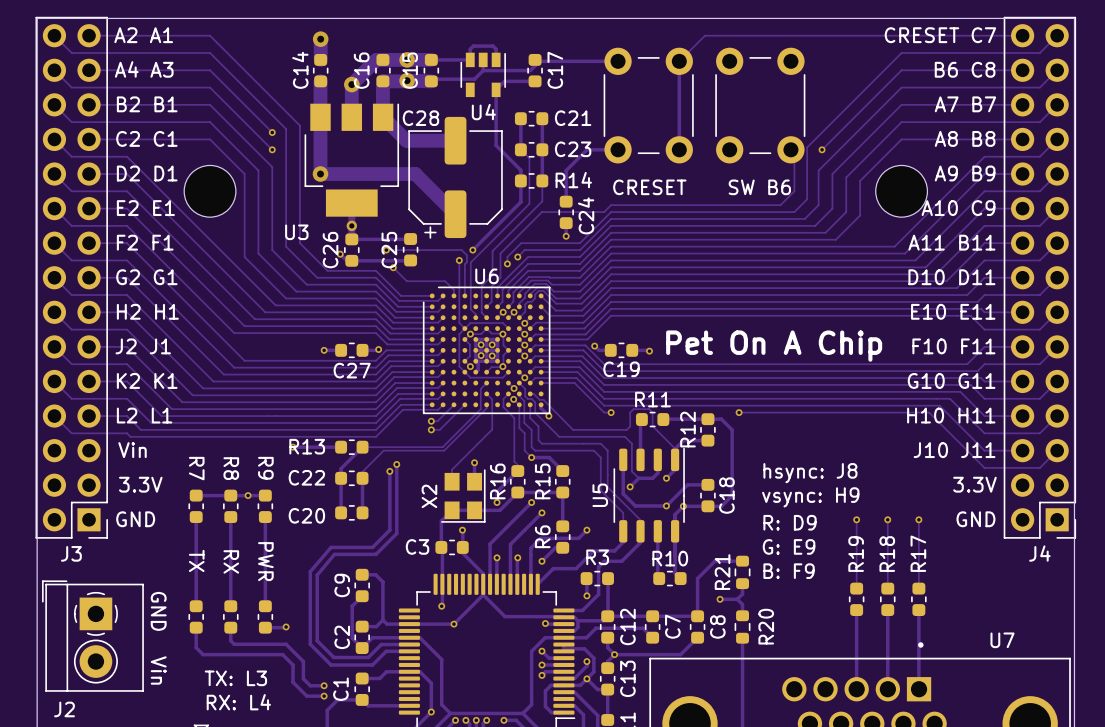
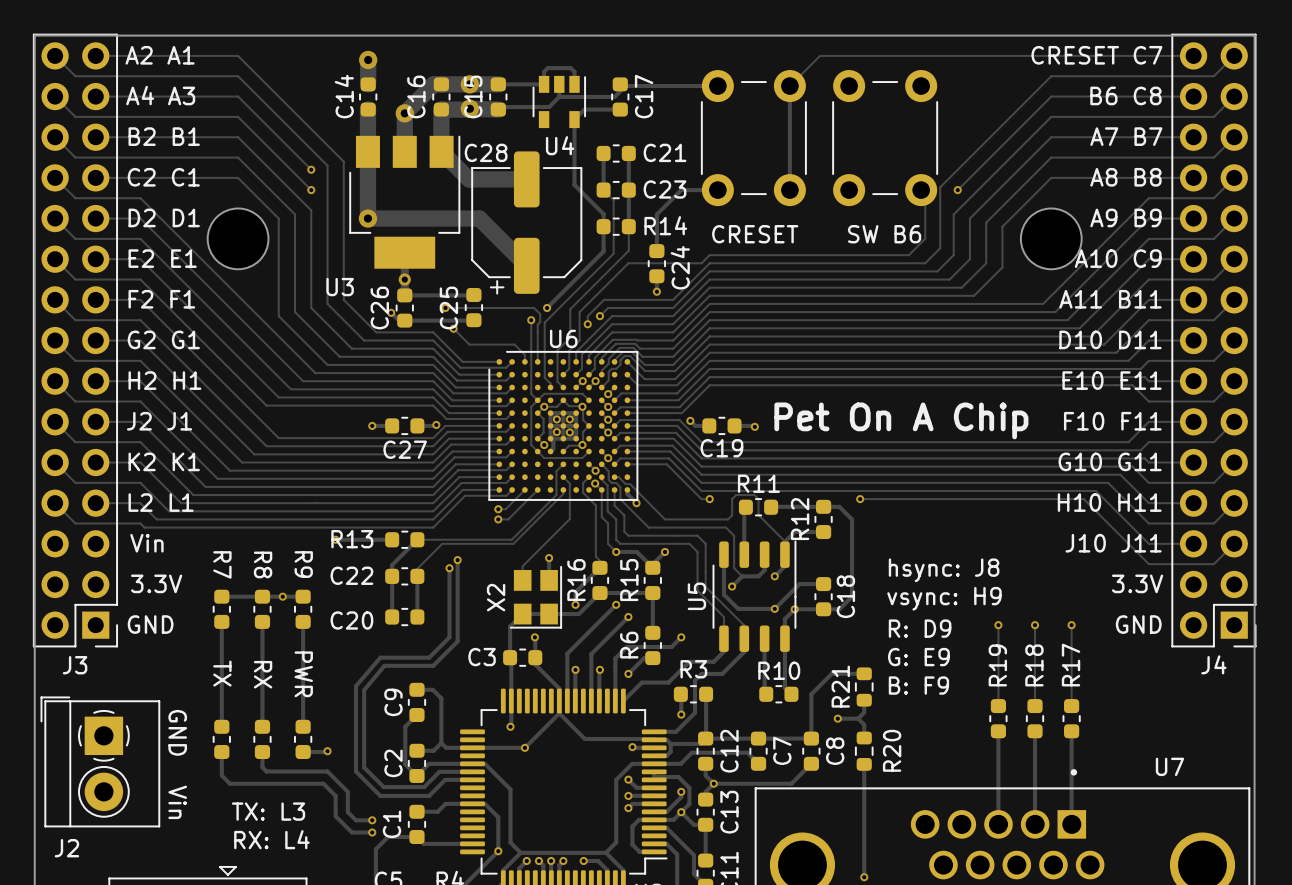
track: none -> (665, 551) (652, 564)
via: none -> (665, 551)

